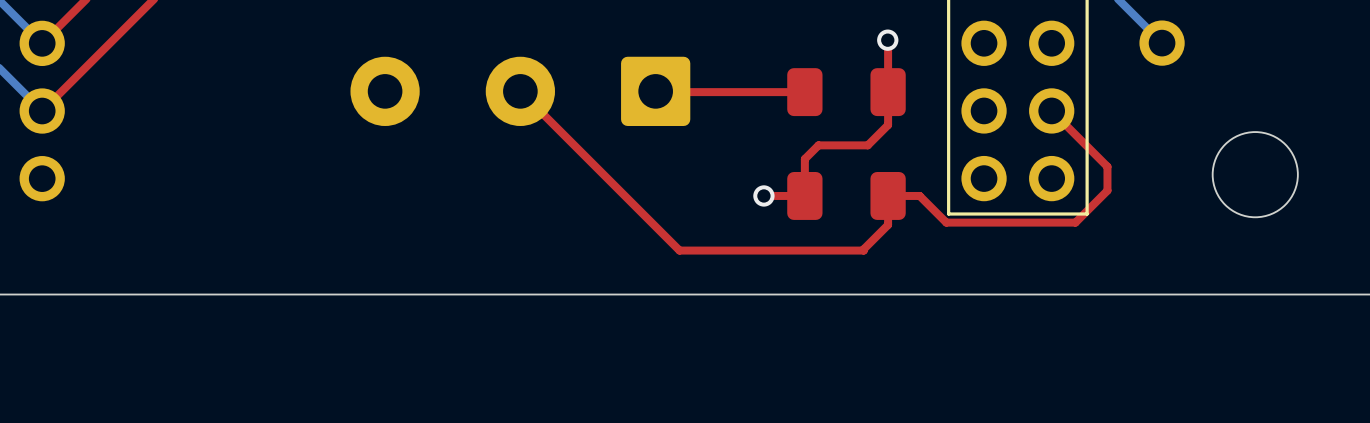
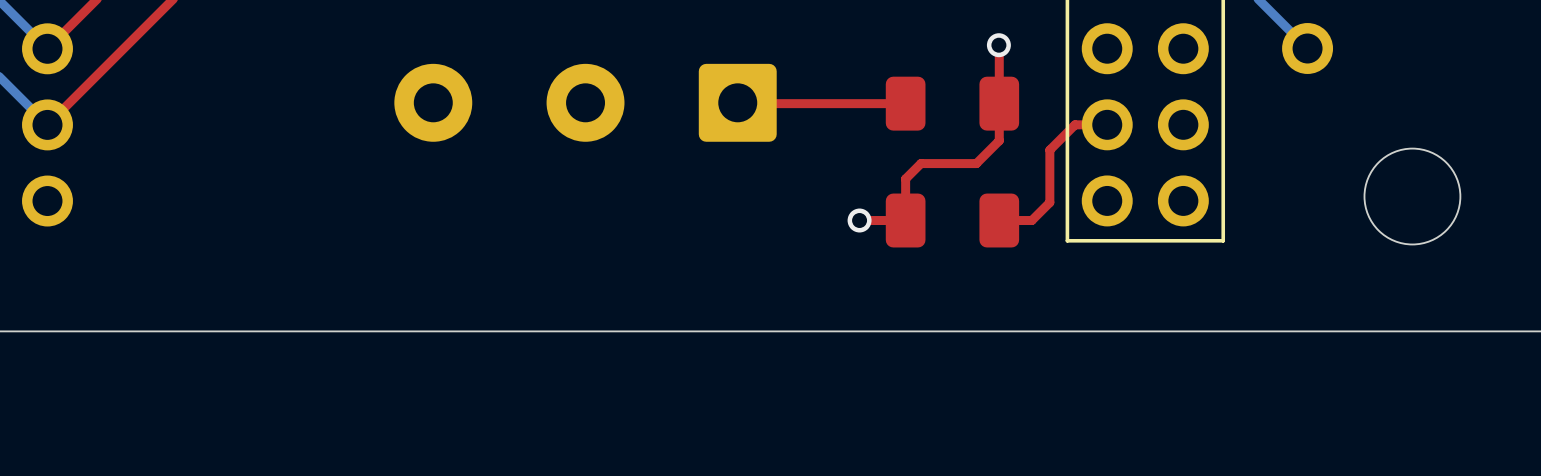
top track: (520, 91) (679, 250) (863, 250) (888, 224) (888, 195) -> none
top track: (1051, 110) (1107, 166) (1107, 190) (1075, 222) (946, 222) (919, 195) (917, 195) -> (1107, 124) (1075, 124) (1049, 150) (1049, 202) (1031, 220)

